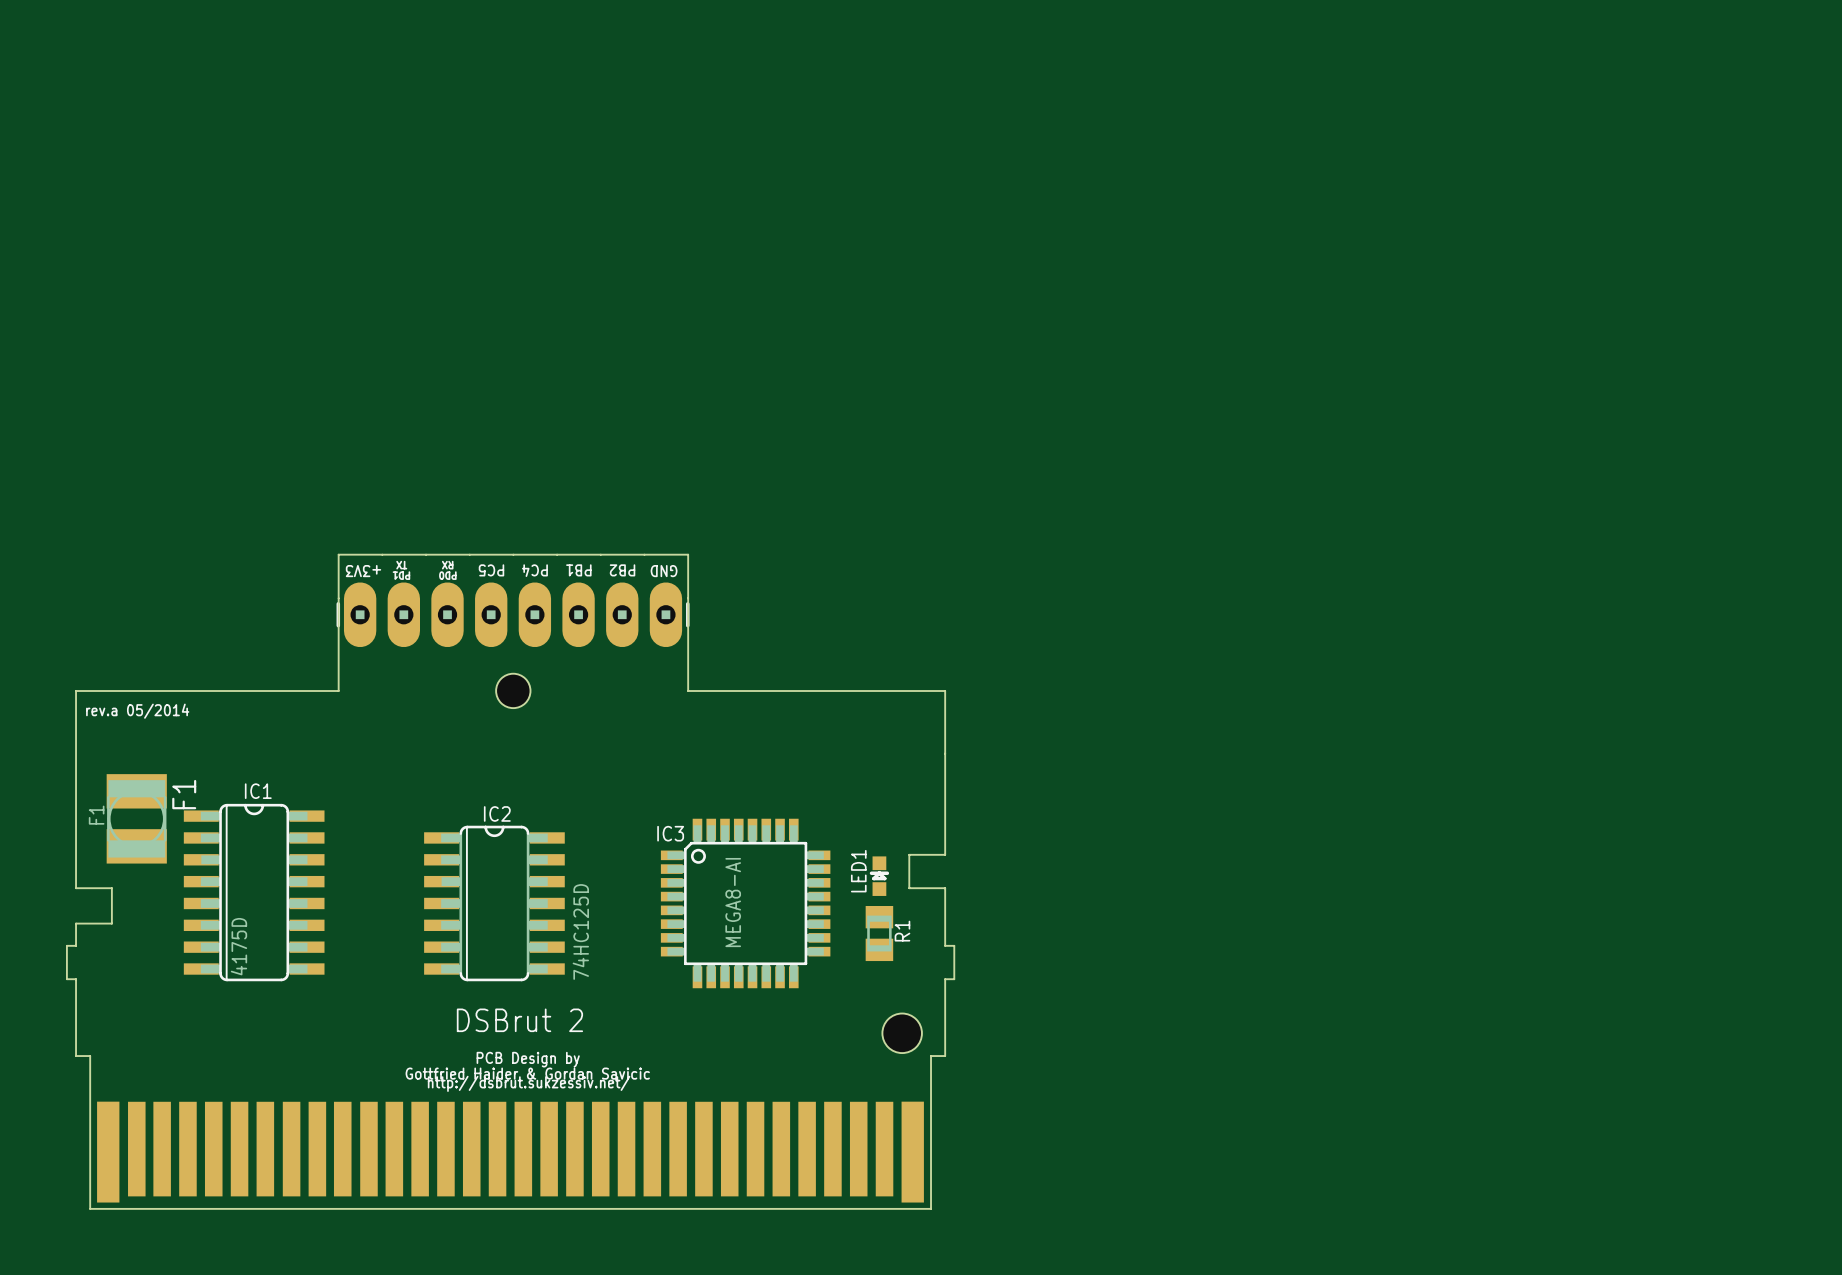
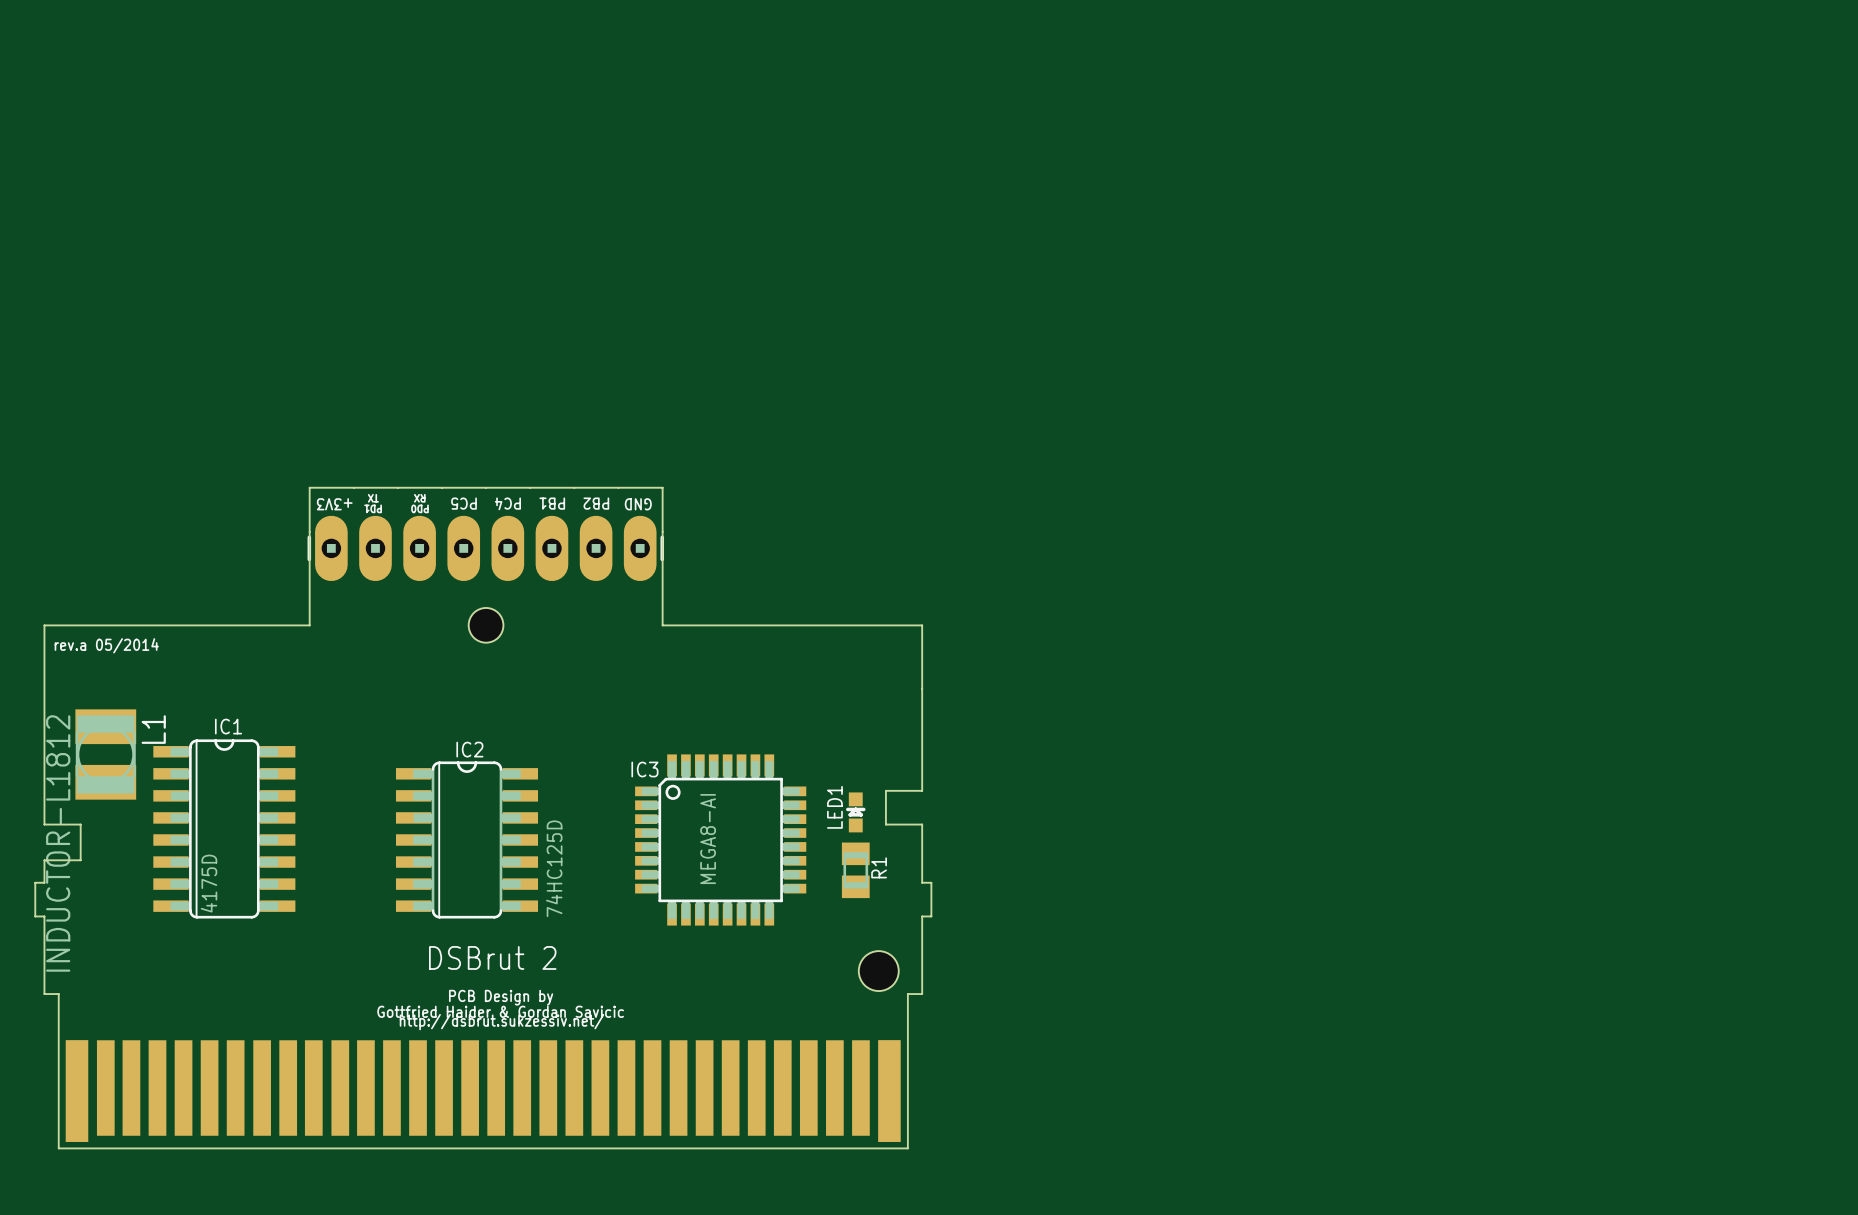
F1 name: F1 (184, 794) -> L1 (153, 729)
F1 value: F1 (96, 815) -> INDUCTOR-L1812 (58, 843)

